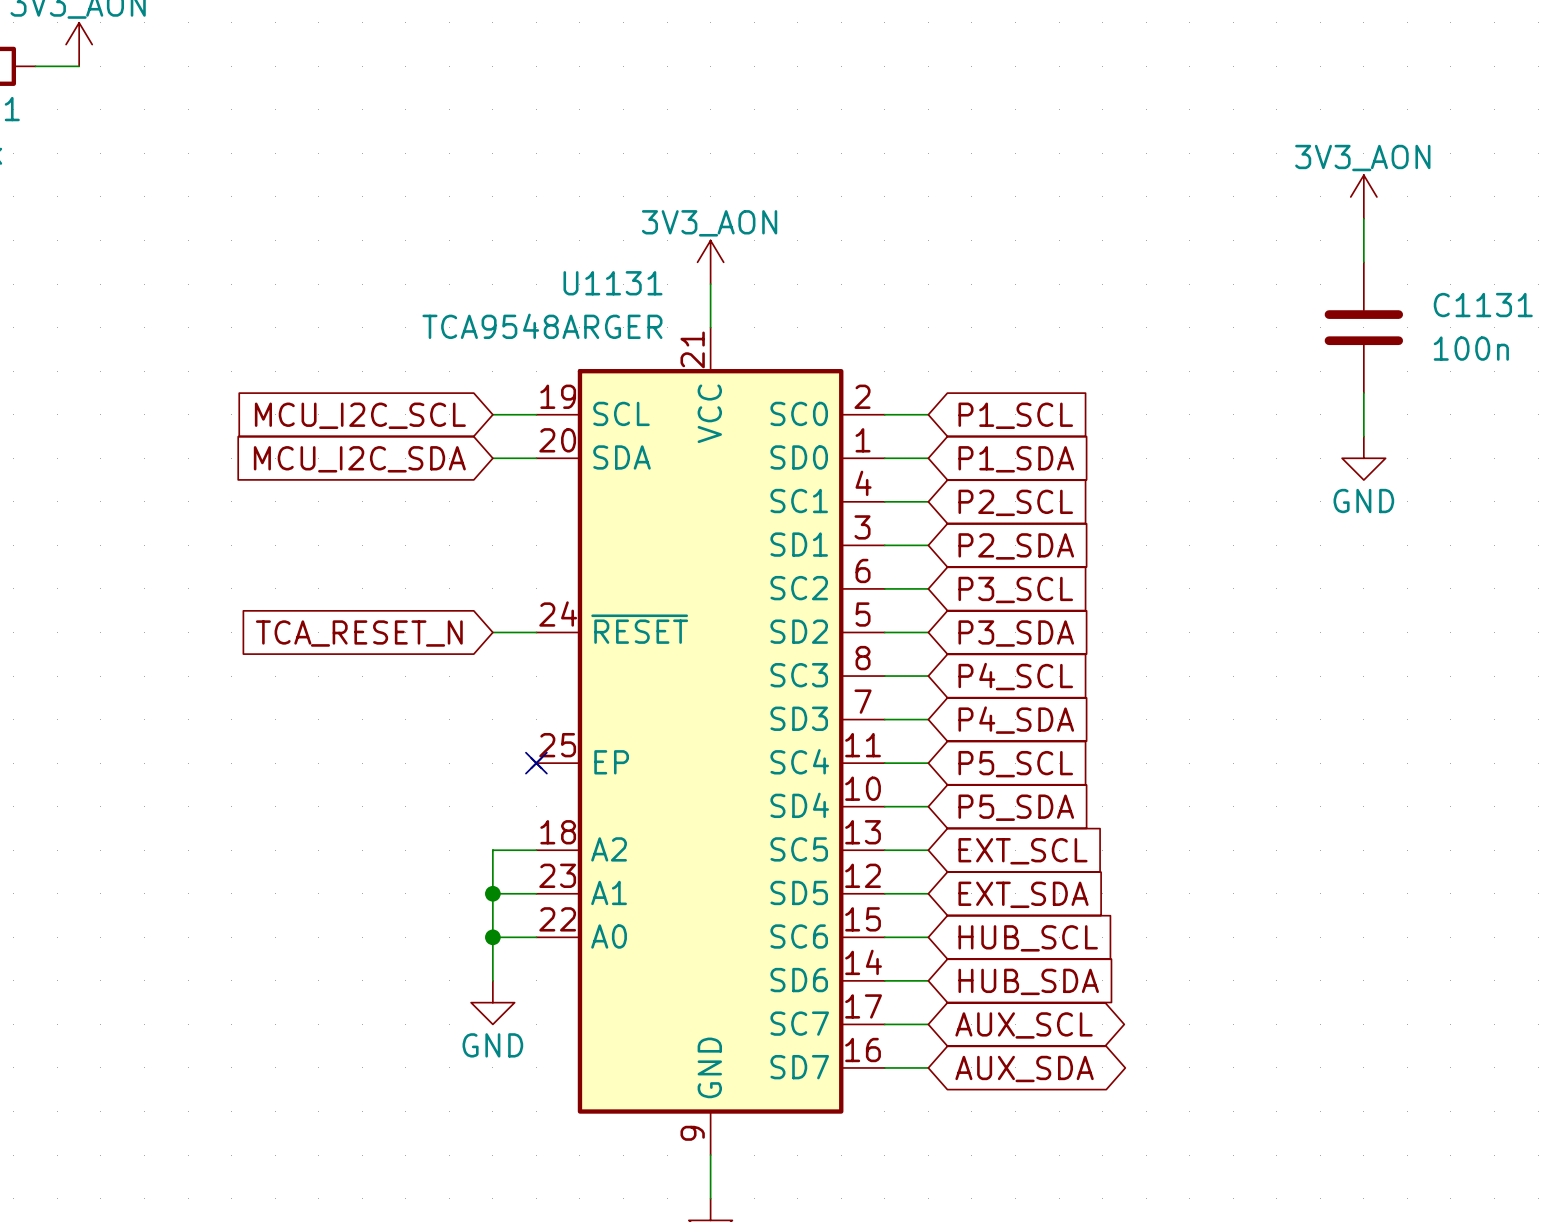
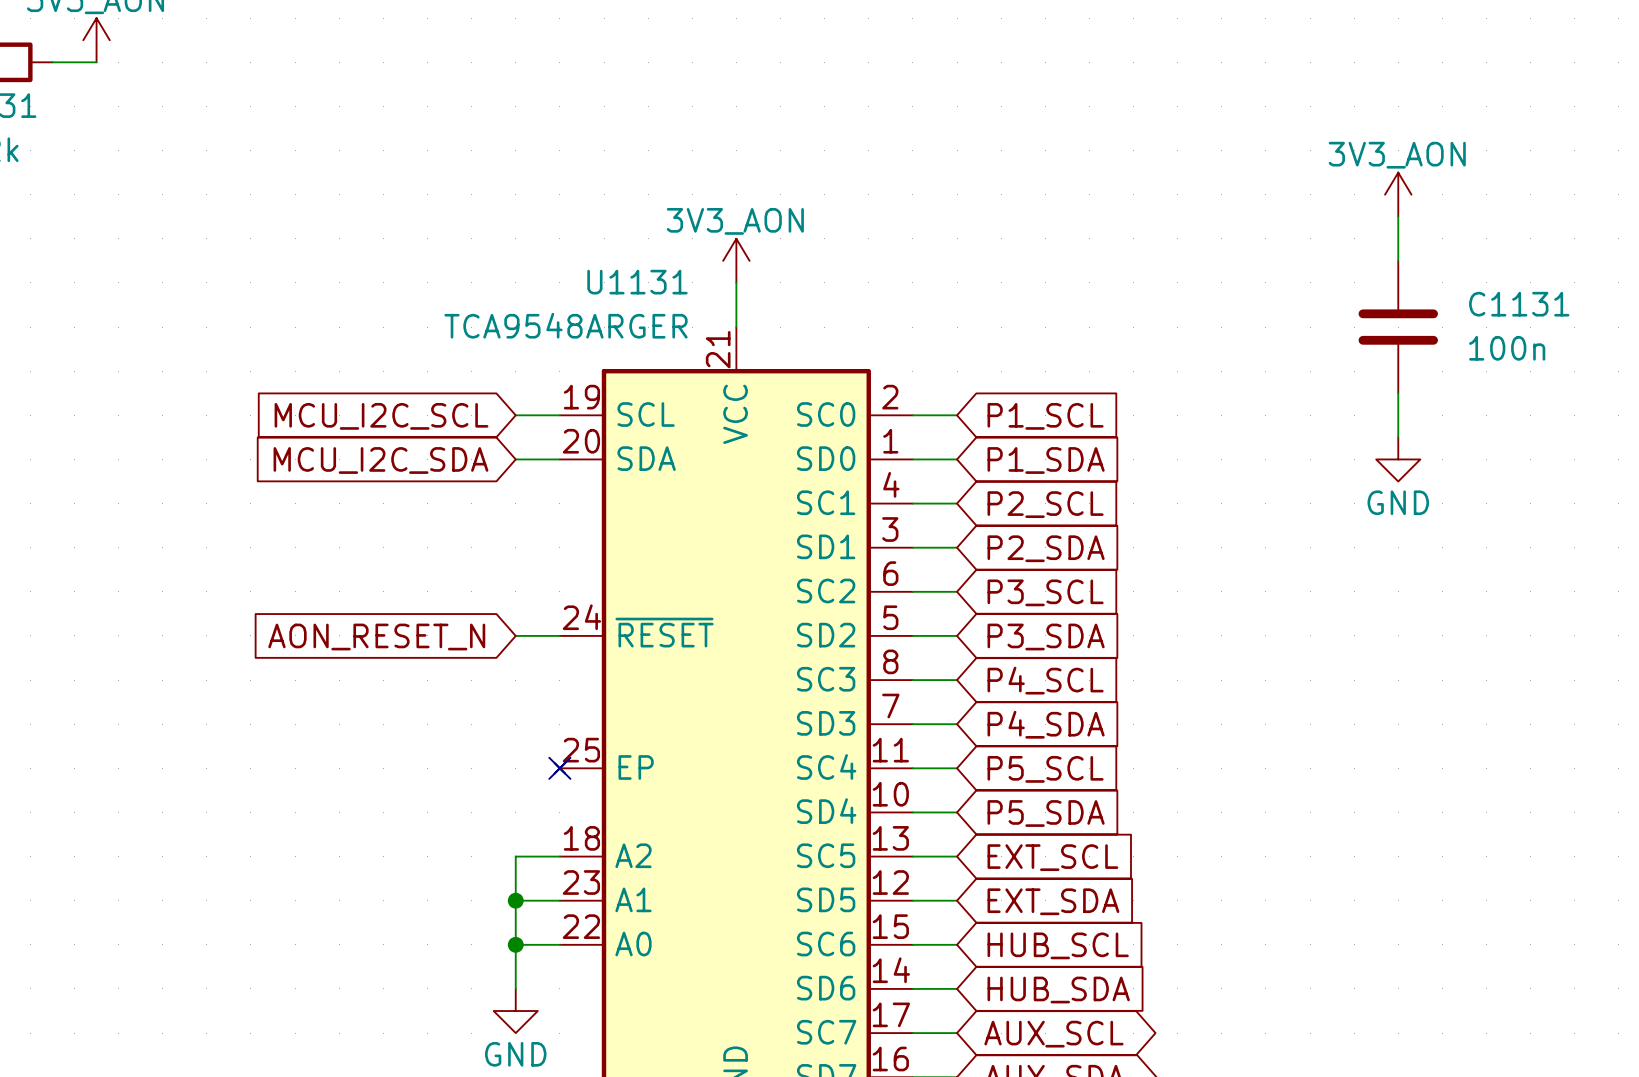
global label: TCA_RESET_N (359, 633) -> AON_RESET_N (376, 637)

